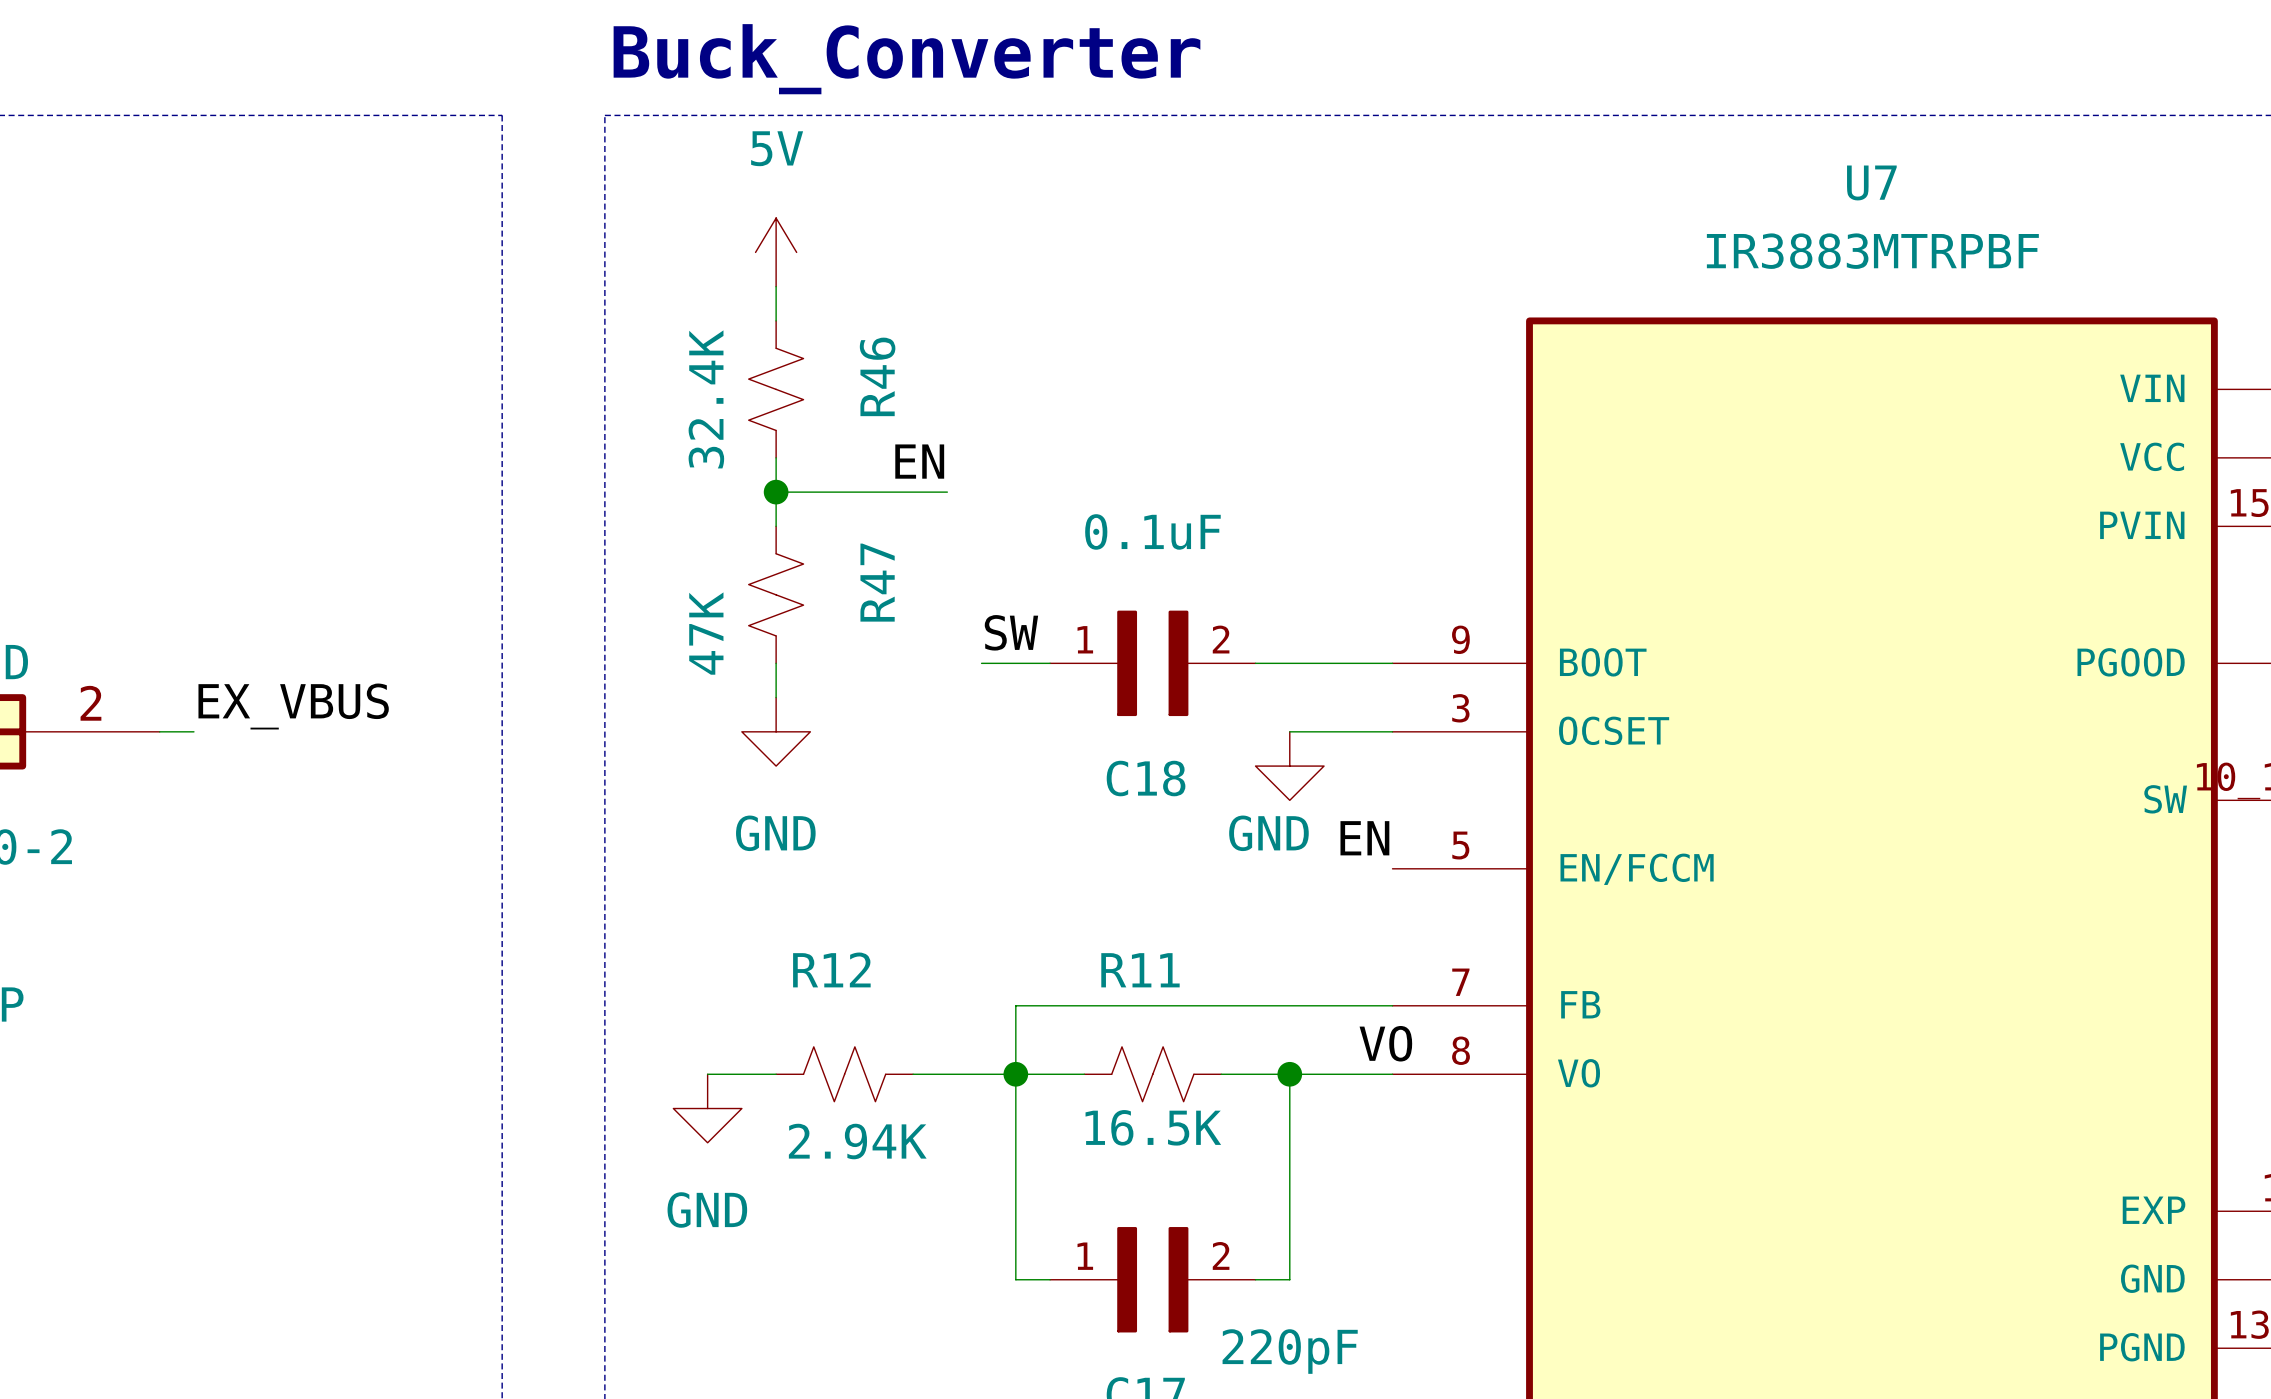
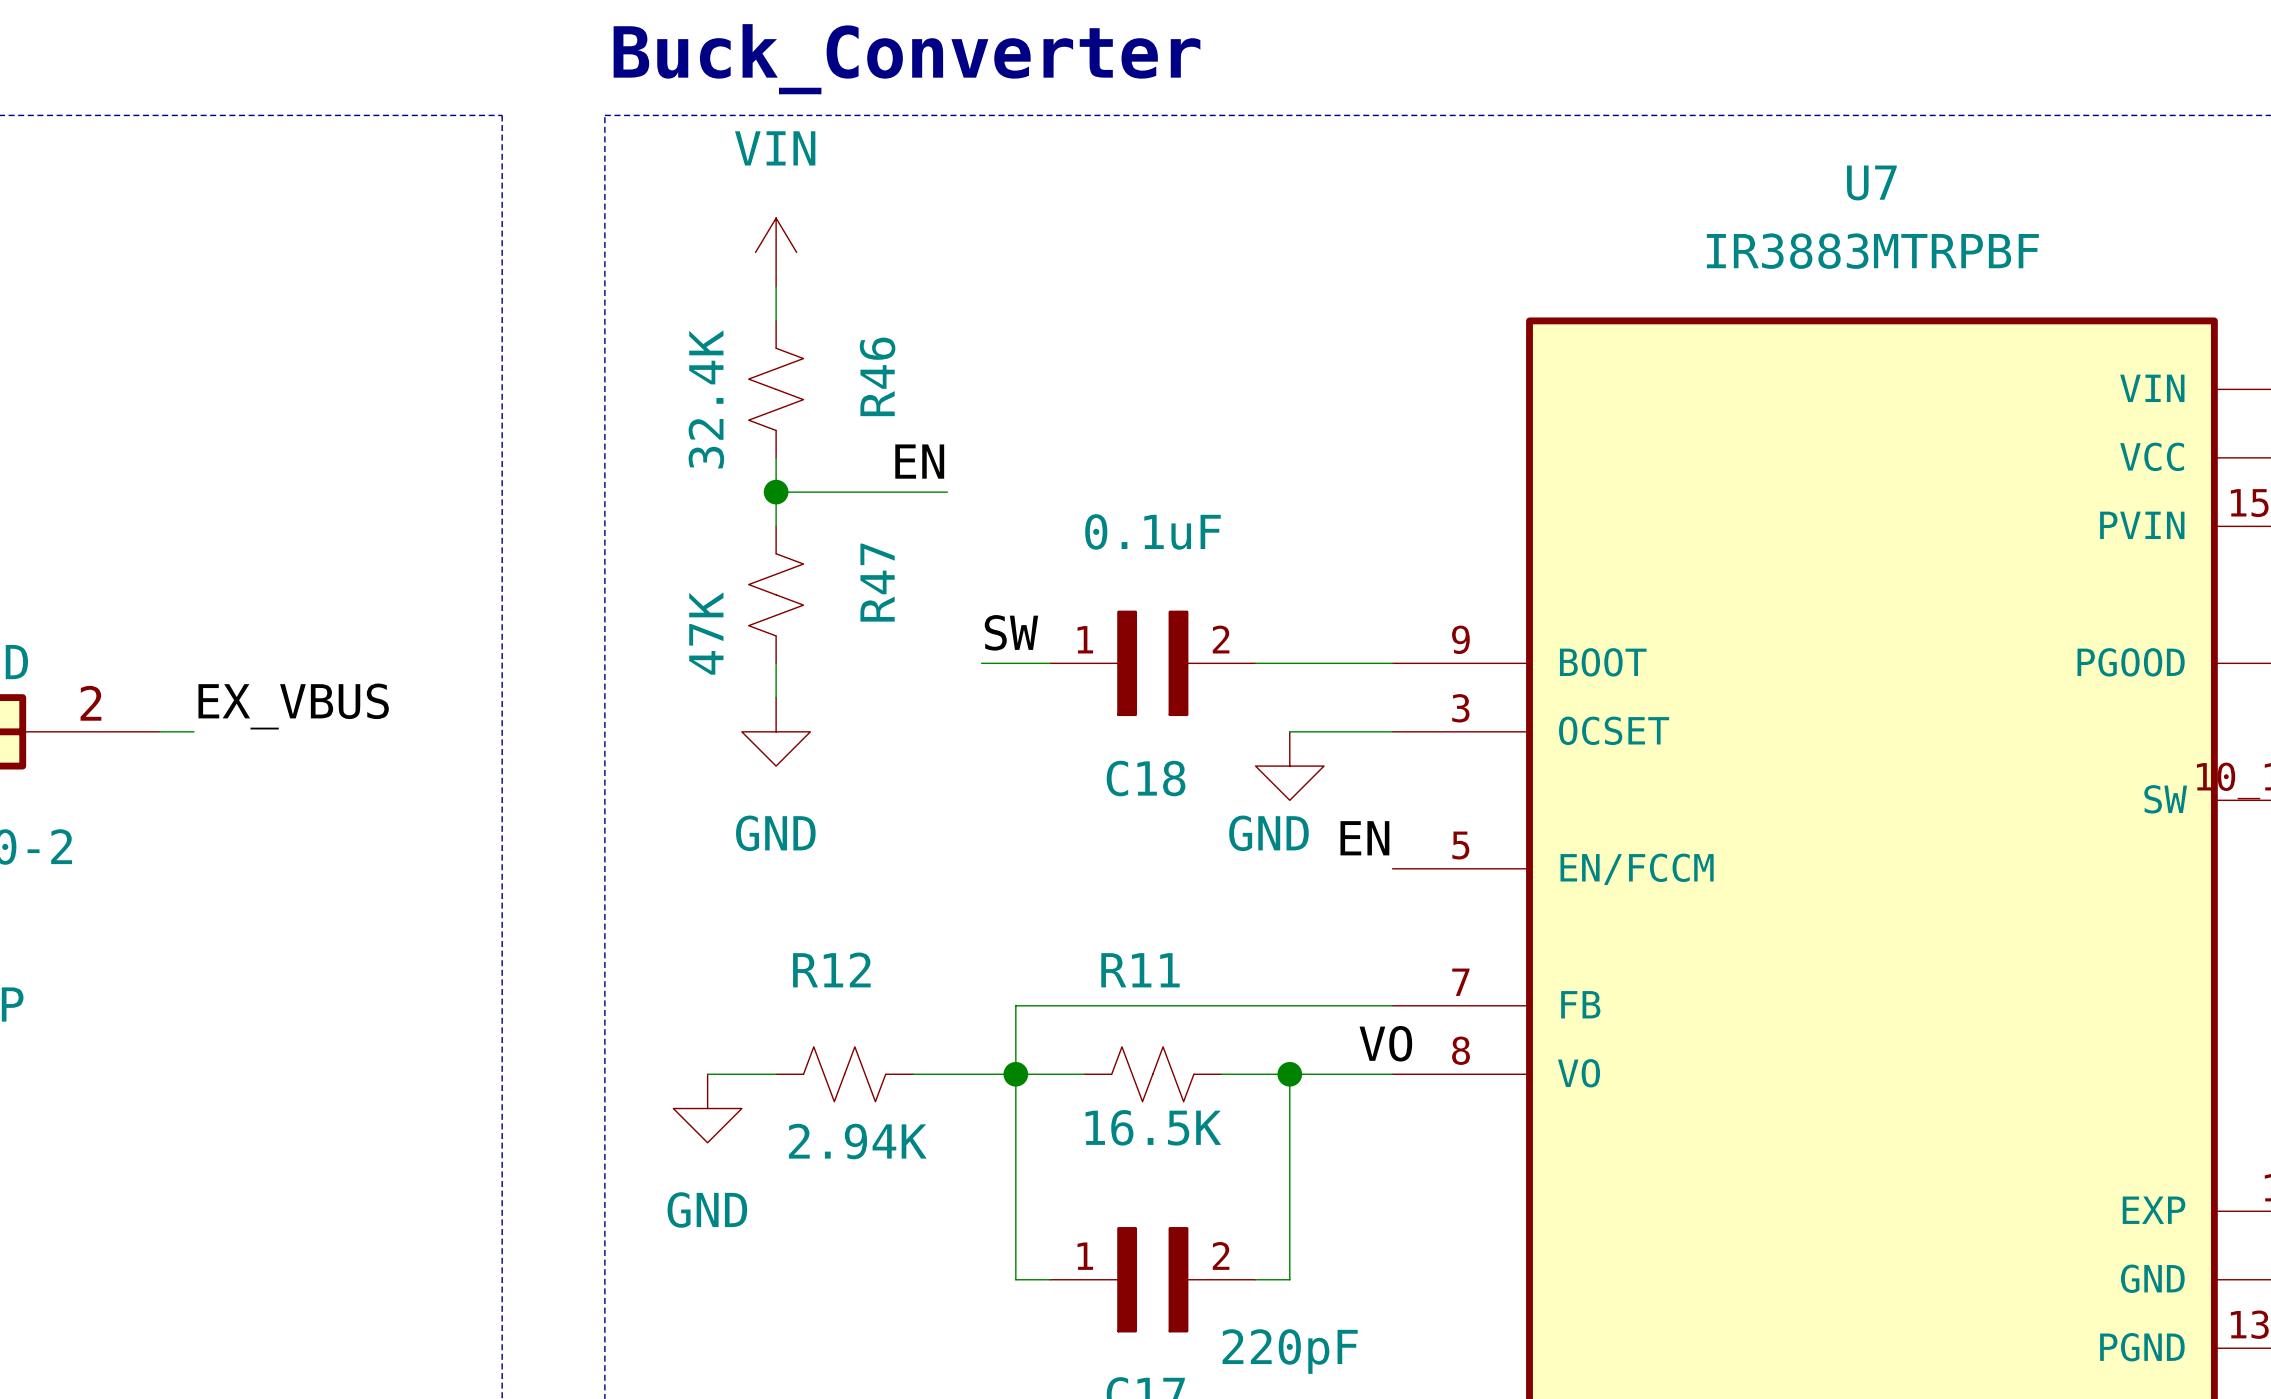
power symbol: 5V (776, 252) -> VIN (776, 252)

